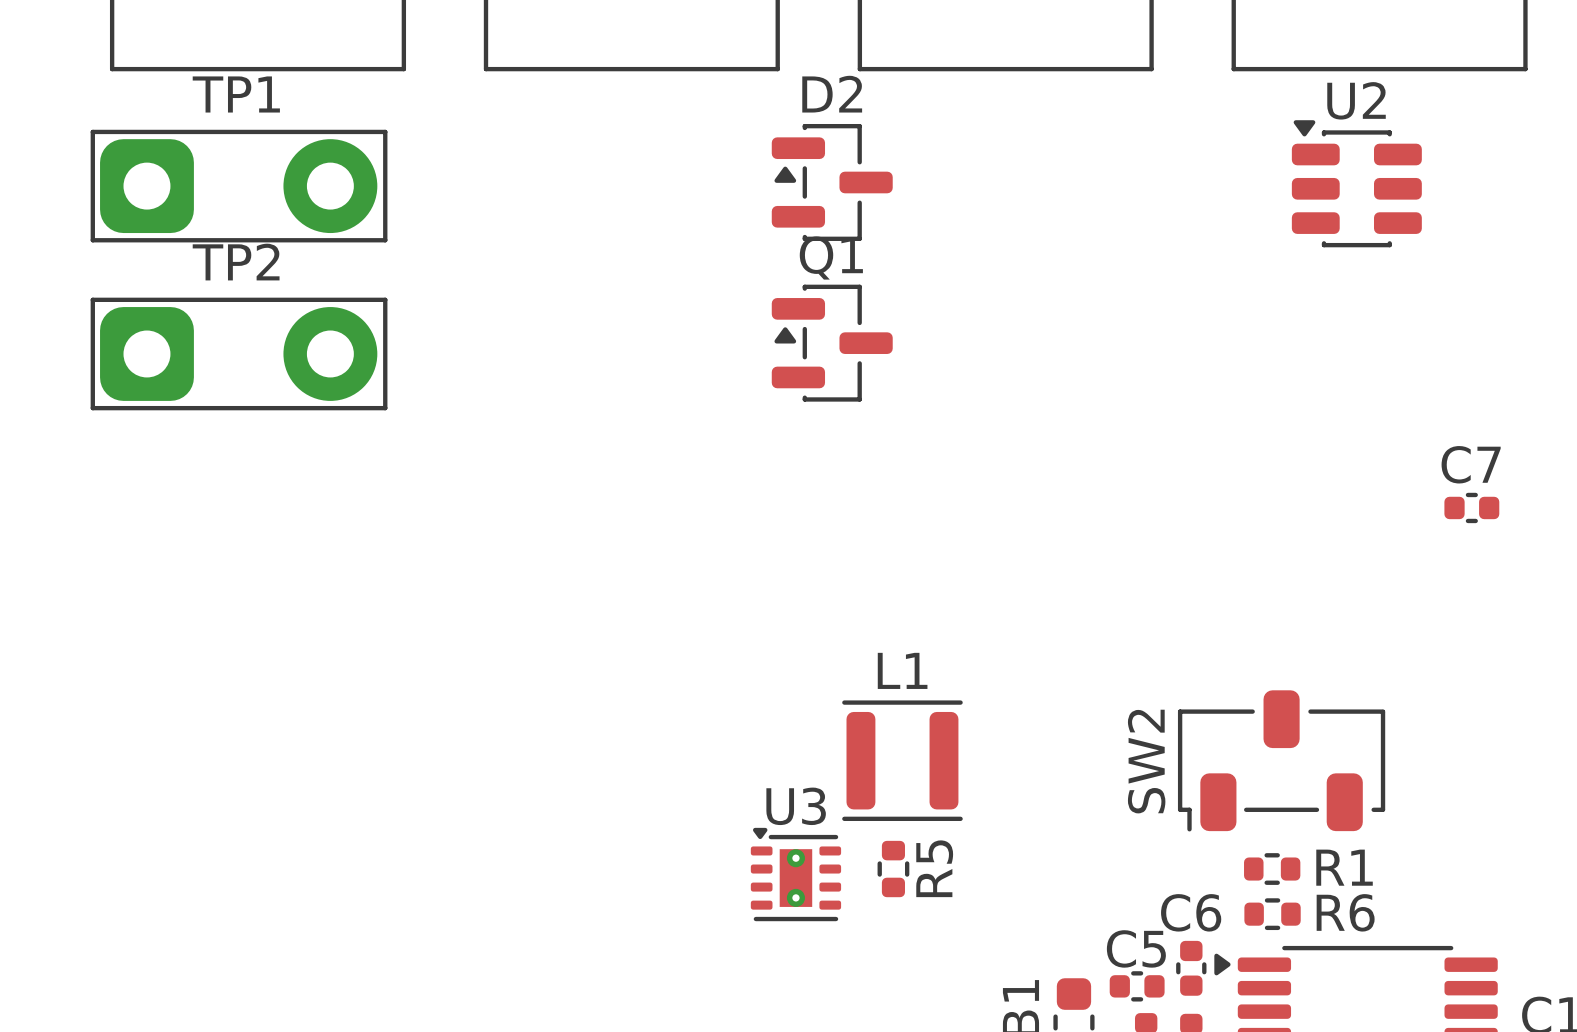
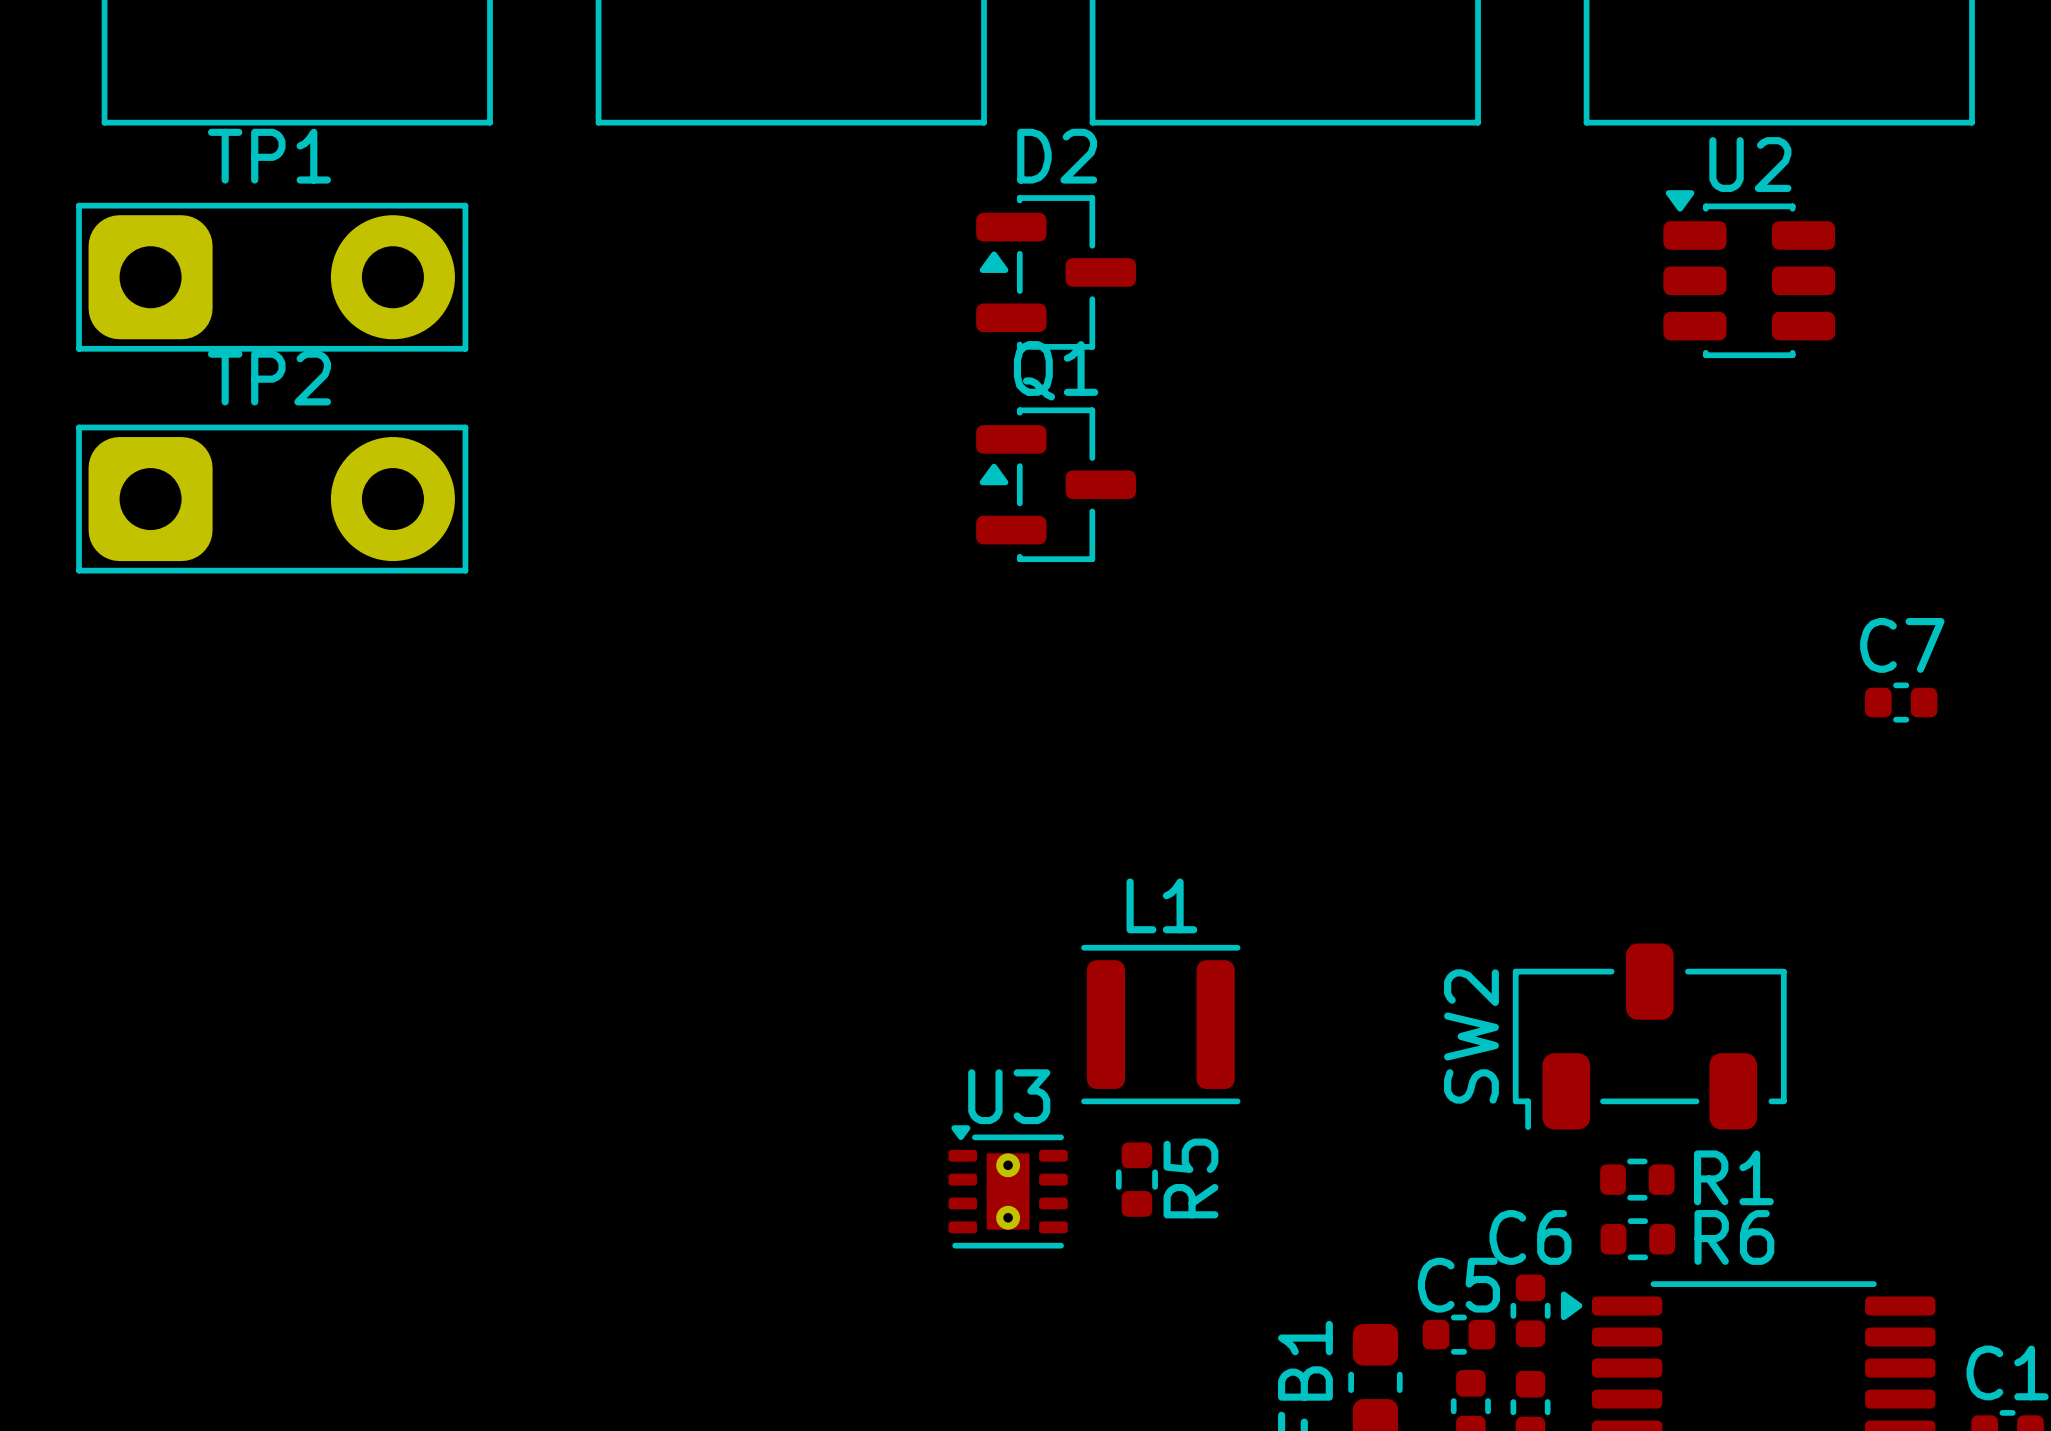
L1 position: (902, 760) -> (1160, 1024)

